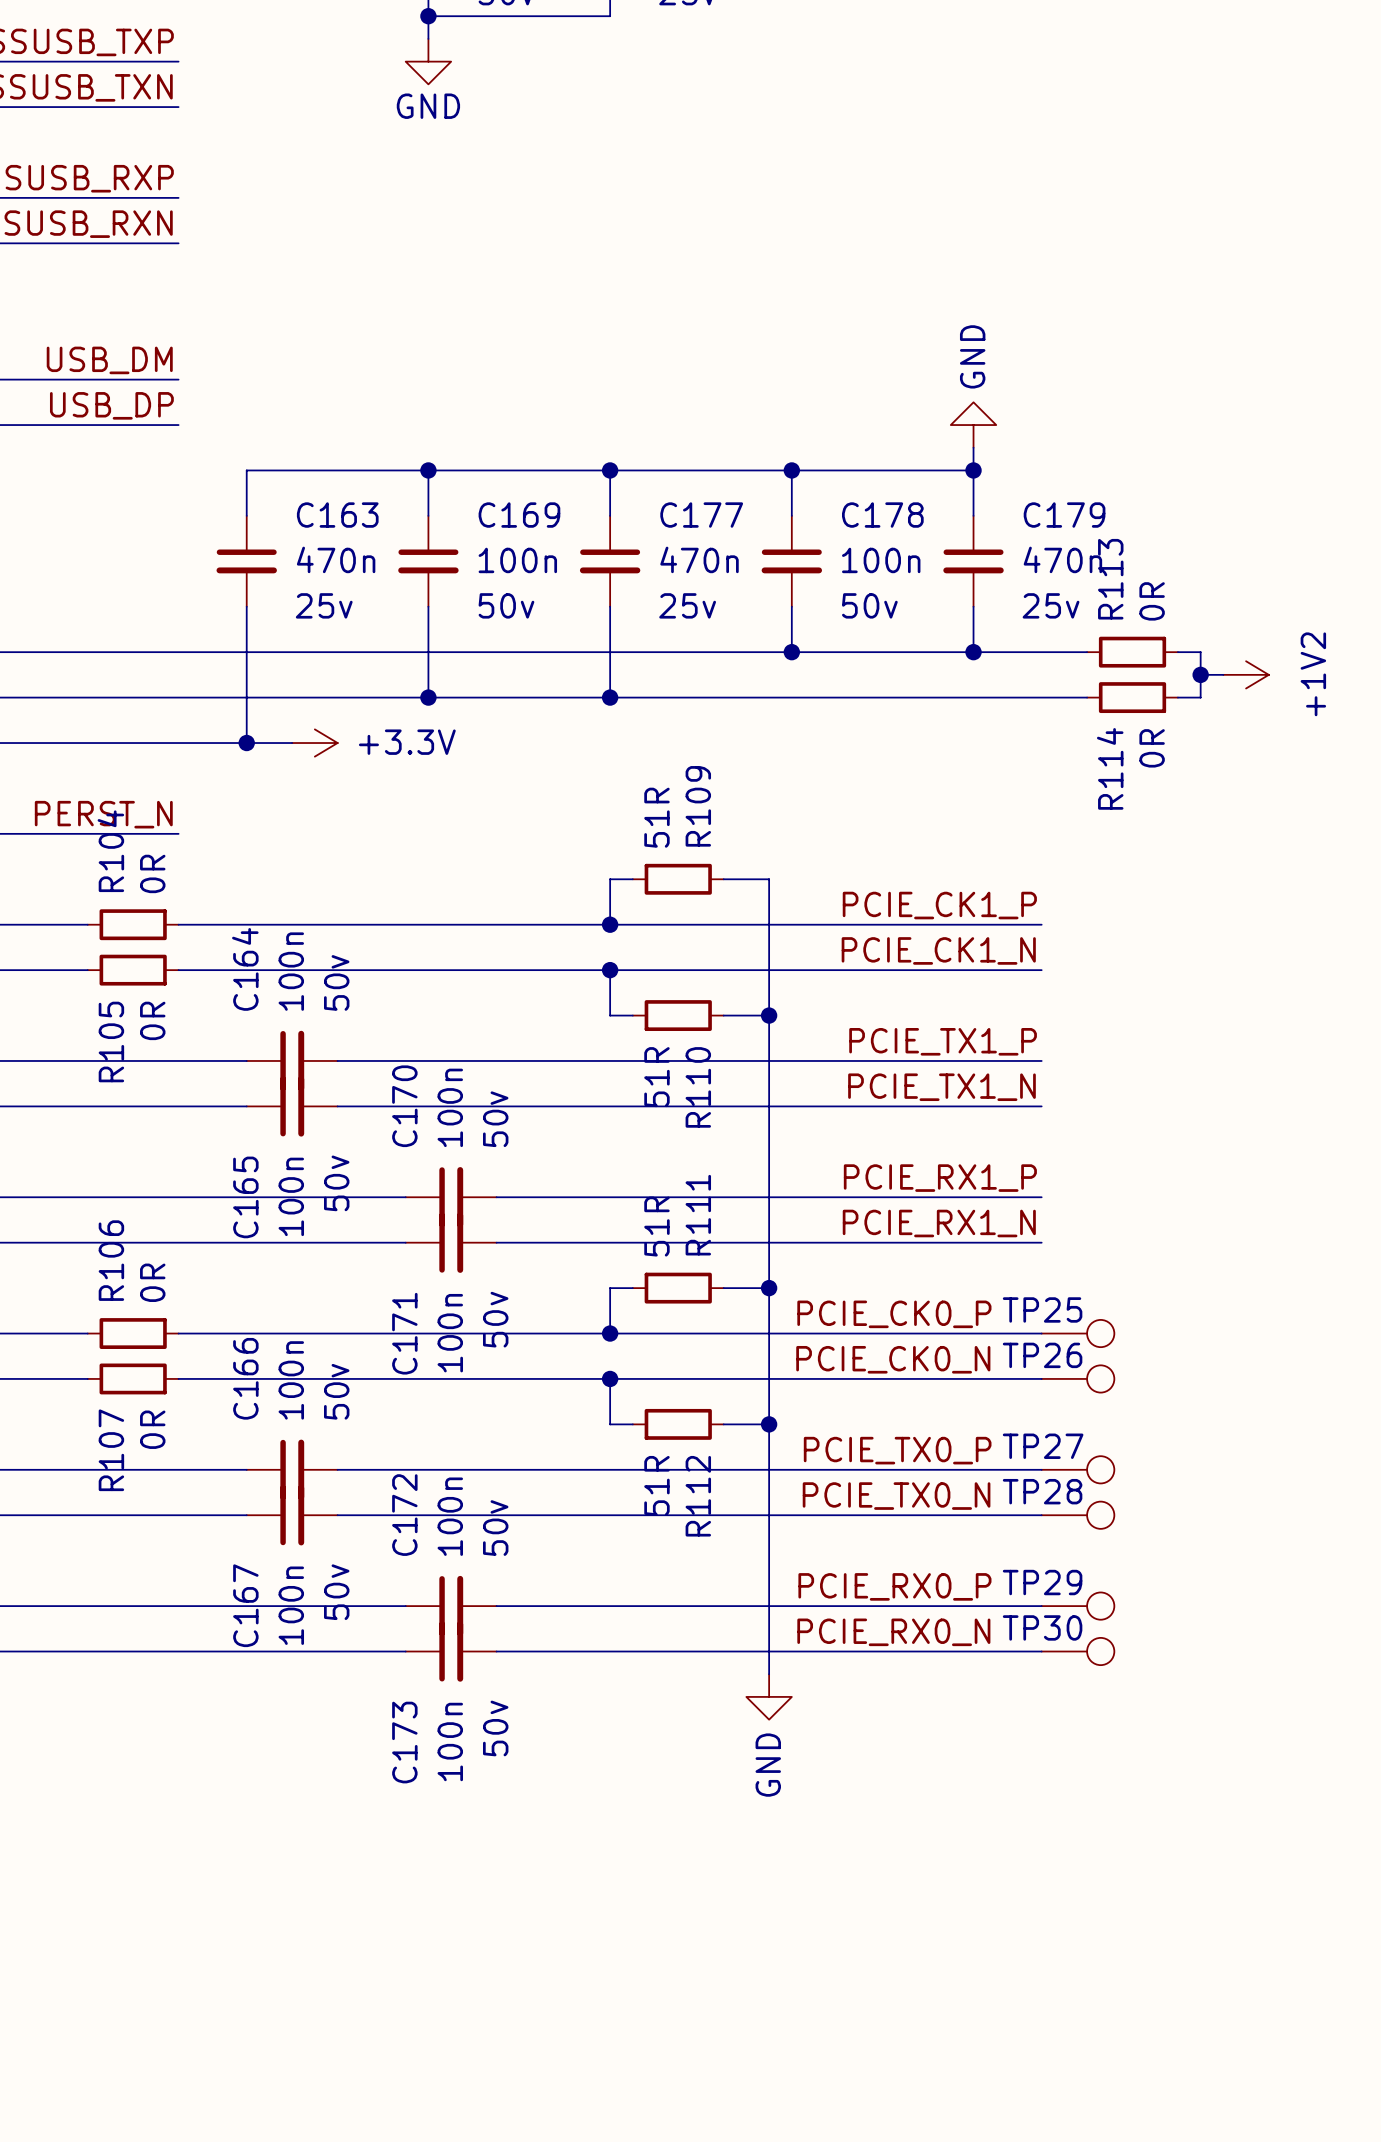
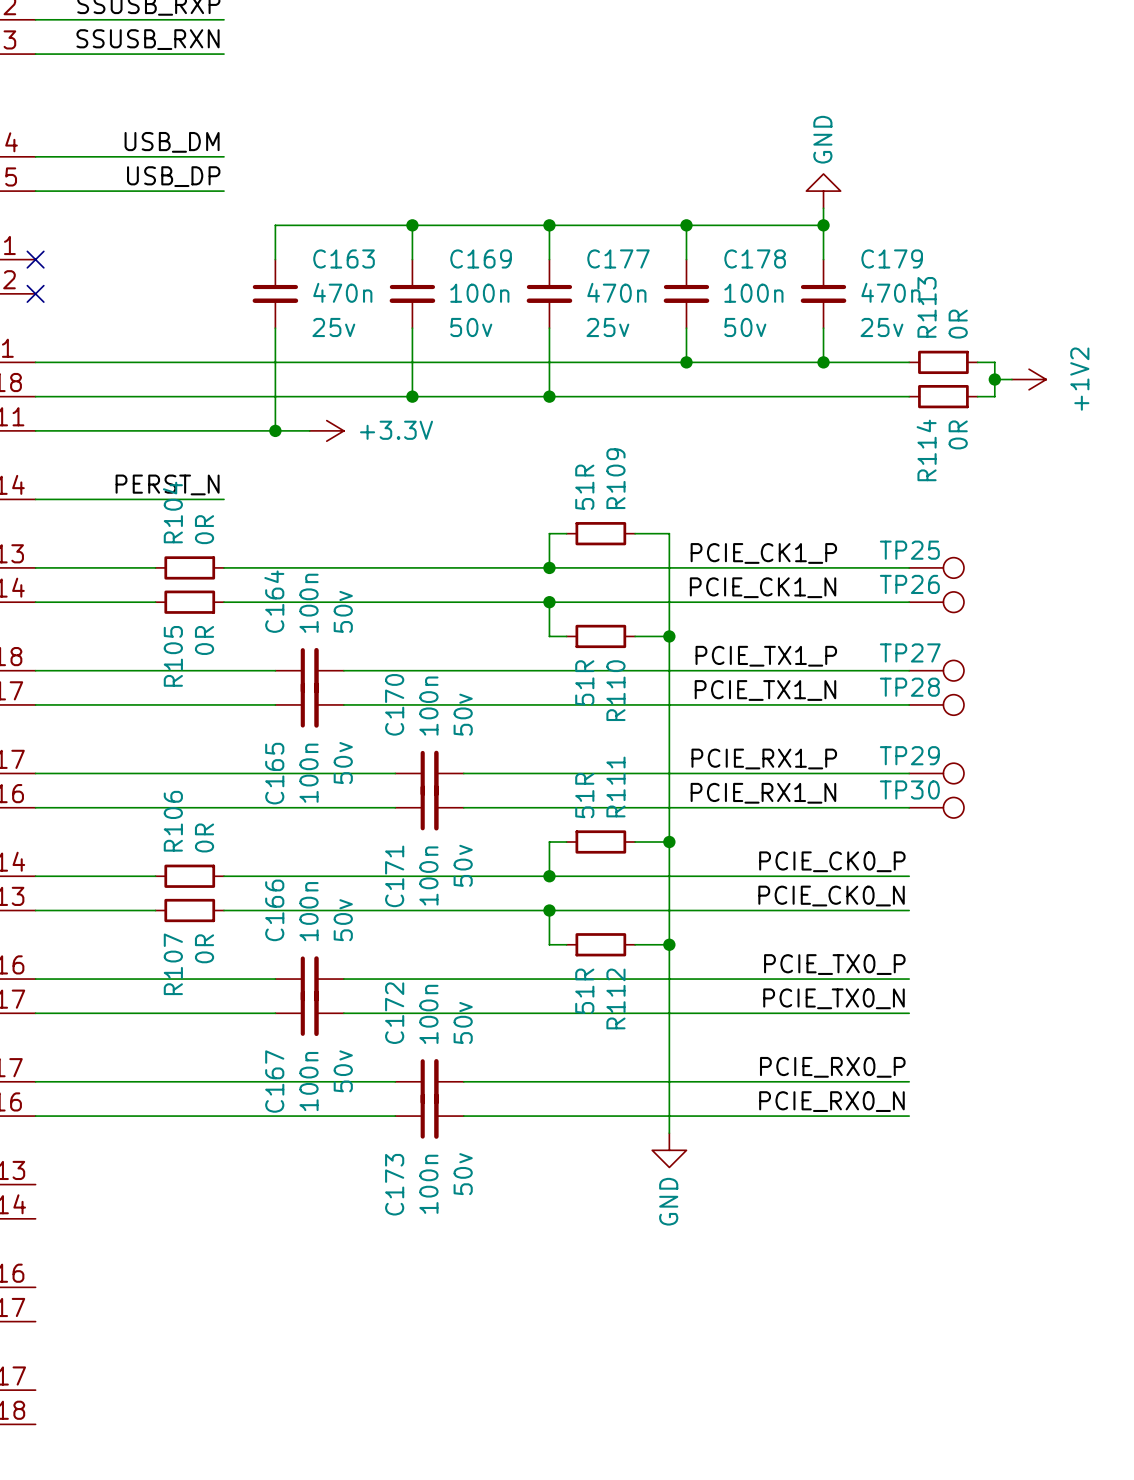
label position: PCIE_CK1_P (939, 905) -> PCIE_CK1_P (763, 553)
wire: none -> (874, 567) (909, 567)
label position: PCIE_CK1_N (938, 950) -> PCIE_CK1_N (763, 587)
wire: none -> (874, 602) (909, 602)
label position: PCIE_TX1_P (943, 1041) -> PCIE_TX1_P (766, 656)
wire: none -> (874, 670) (909, 670)
label position: PCIE_TX1_N (941, 1087) -> PCIE_TX1_N (765, 690)
wire: none -> (874, 704) (909, 704)
label position: PCIE_RX1_P (940, 1178) -> PCIE_RX1_P (764, 759)
wire: none -> (874, 773) (909, 773)
label position: PCIE_RX1_N (939, 1223) -> PCIE_RX1_N (763, 793)
wire: none -> (874, 807) (909, 807)
label position: PCIE_CK0_P (894, 1314) -> PCIE_CK0_P (832, 861)
TP25 position: (1078, 1333) -> (936, 567)
label position: PCIE_CK0_N (893, 1359) -> PCIE_CK0_N (831, 896)
TP26 position: (1078, 1378) -> (936, 602)
label position: PCIE_TX0_P (897, 1450) -> PCIE_TX0_P (834, 964)
TP27 position: (1078, 1469) -> (936, 670)
label position: PCIE_TX0_N (896, 1496) -> PCIE_TX0_N (833, 998)
TP28 position: (1078, 1515) -> (936, 704)
label position: PCIE_RX0_P (894, 1586) -> PCIE_RX0_P (832, 1067)
TP29 position: (1078, 1606) -> (936, 773)
label position: PCIE_RX0_N (893, 1632) -> PCIE_RX0_N (831, 1101)
TP30 position: (1078, 1651) -> (936, 807)

